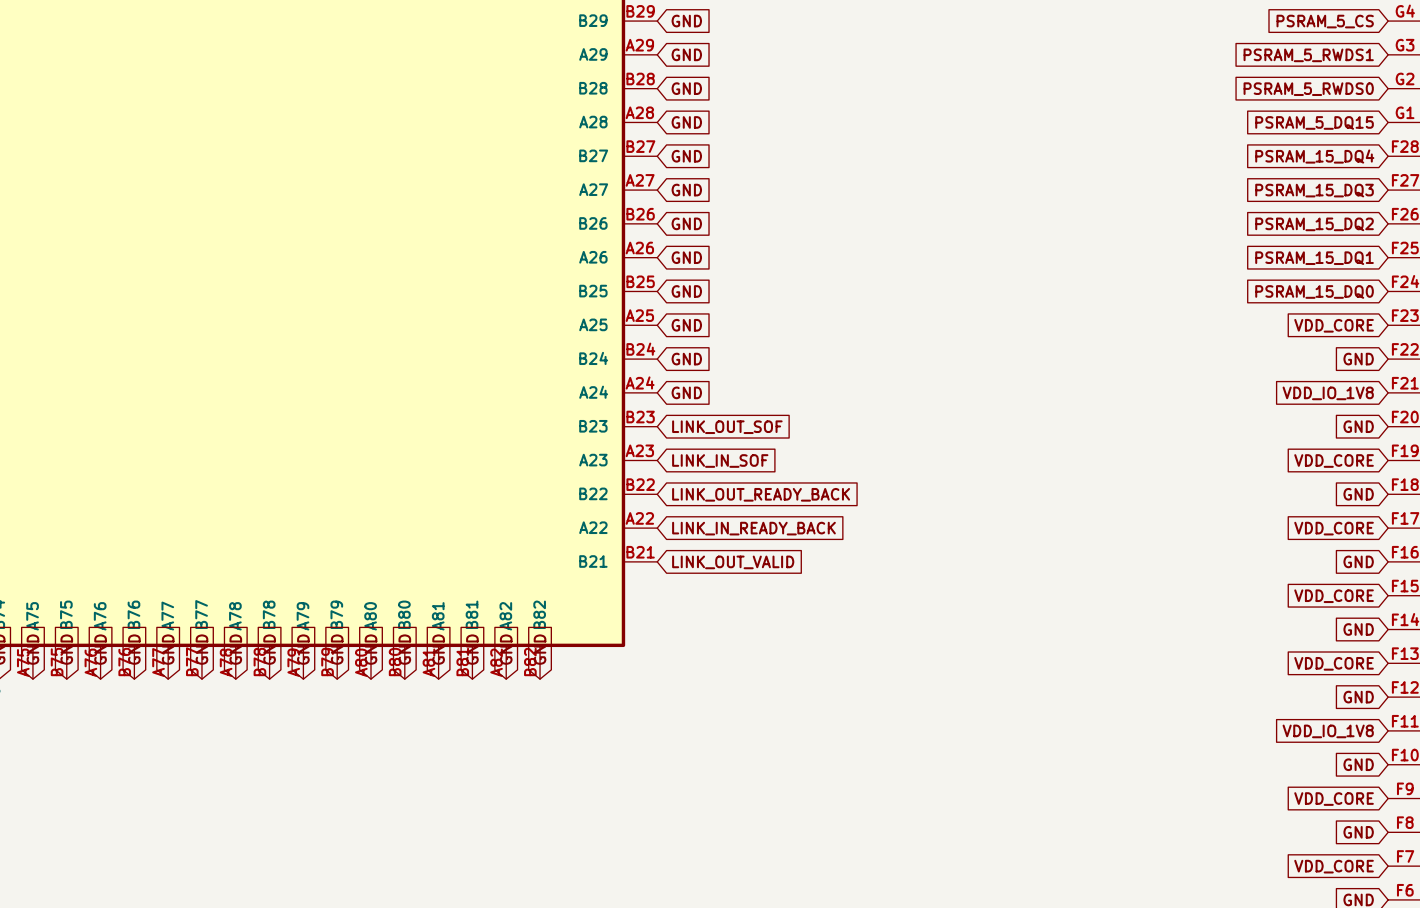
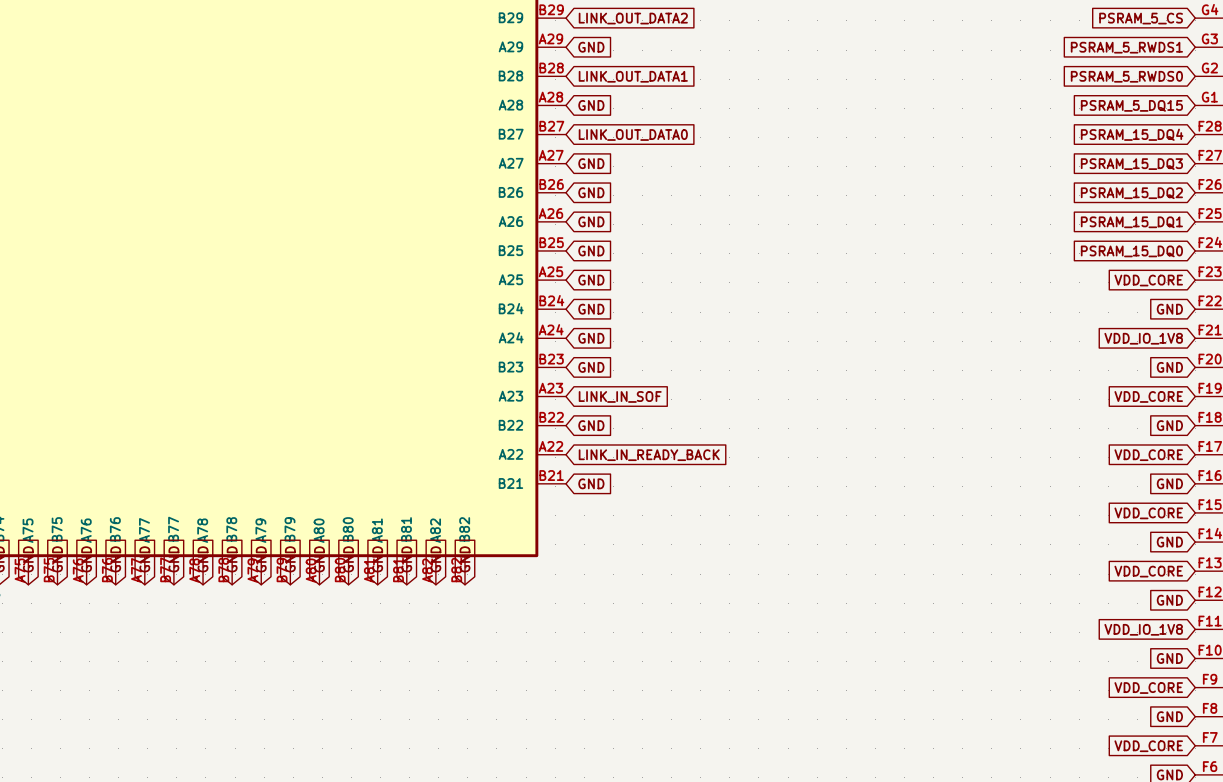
global label: GND (686, 21) -> LINK_OUT_DATA2 (633, 18)
global label: GND (686, 88) -> LINK_OUT_DATA1 (633, 76)
global label: GND (686, 156) -> LINK_OUT_DATA0 (633, 134)
global label: LINK_OUT_SOF (727, 427) -> GND (591, 367)
global label: LINK_OUT_READY_BACK (761, 494) -> GND (591, 425)
global label: LINK_OUT_VALID (733, 562) -> GND (591, 483)

